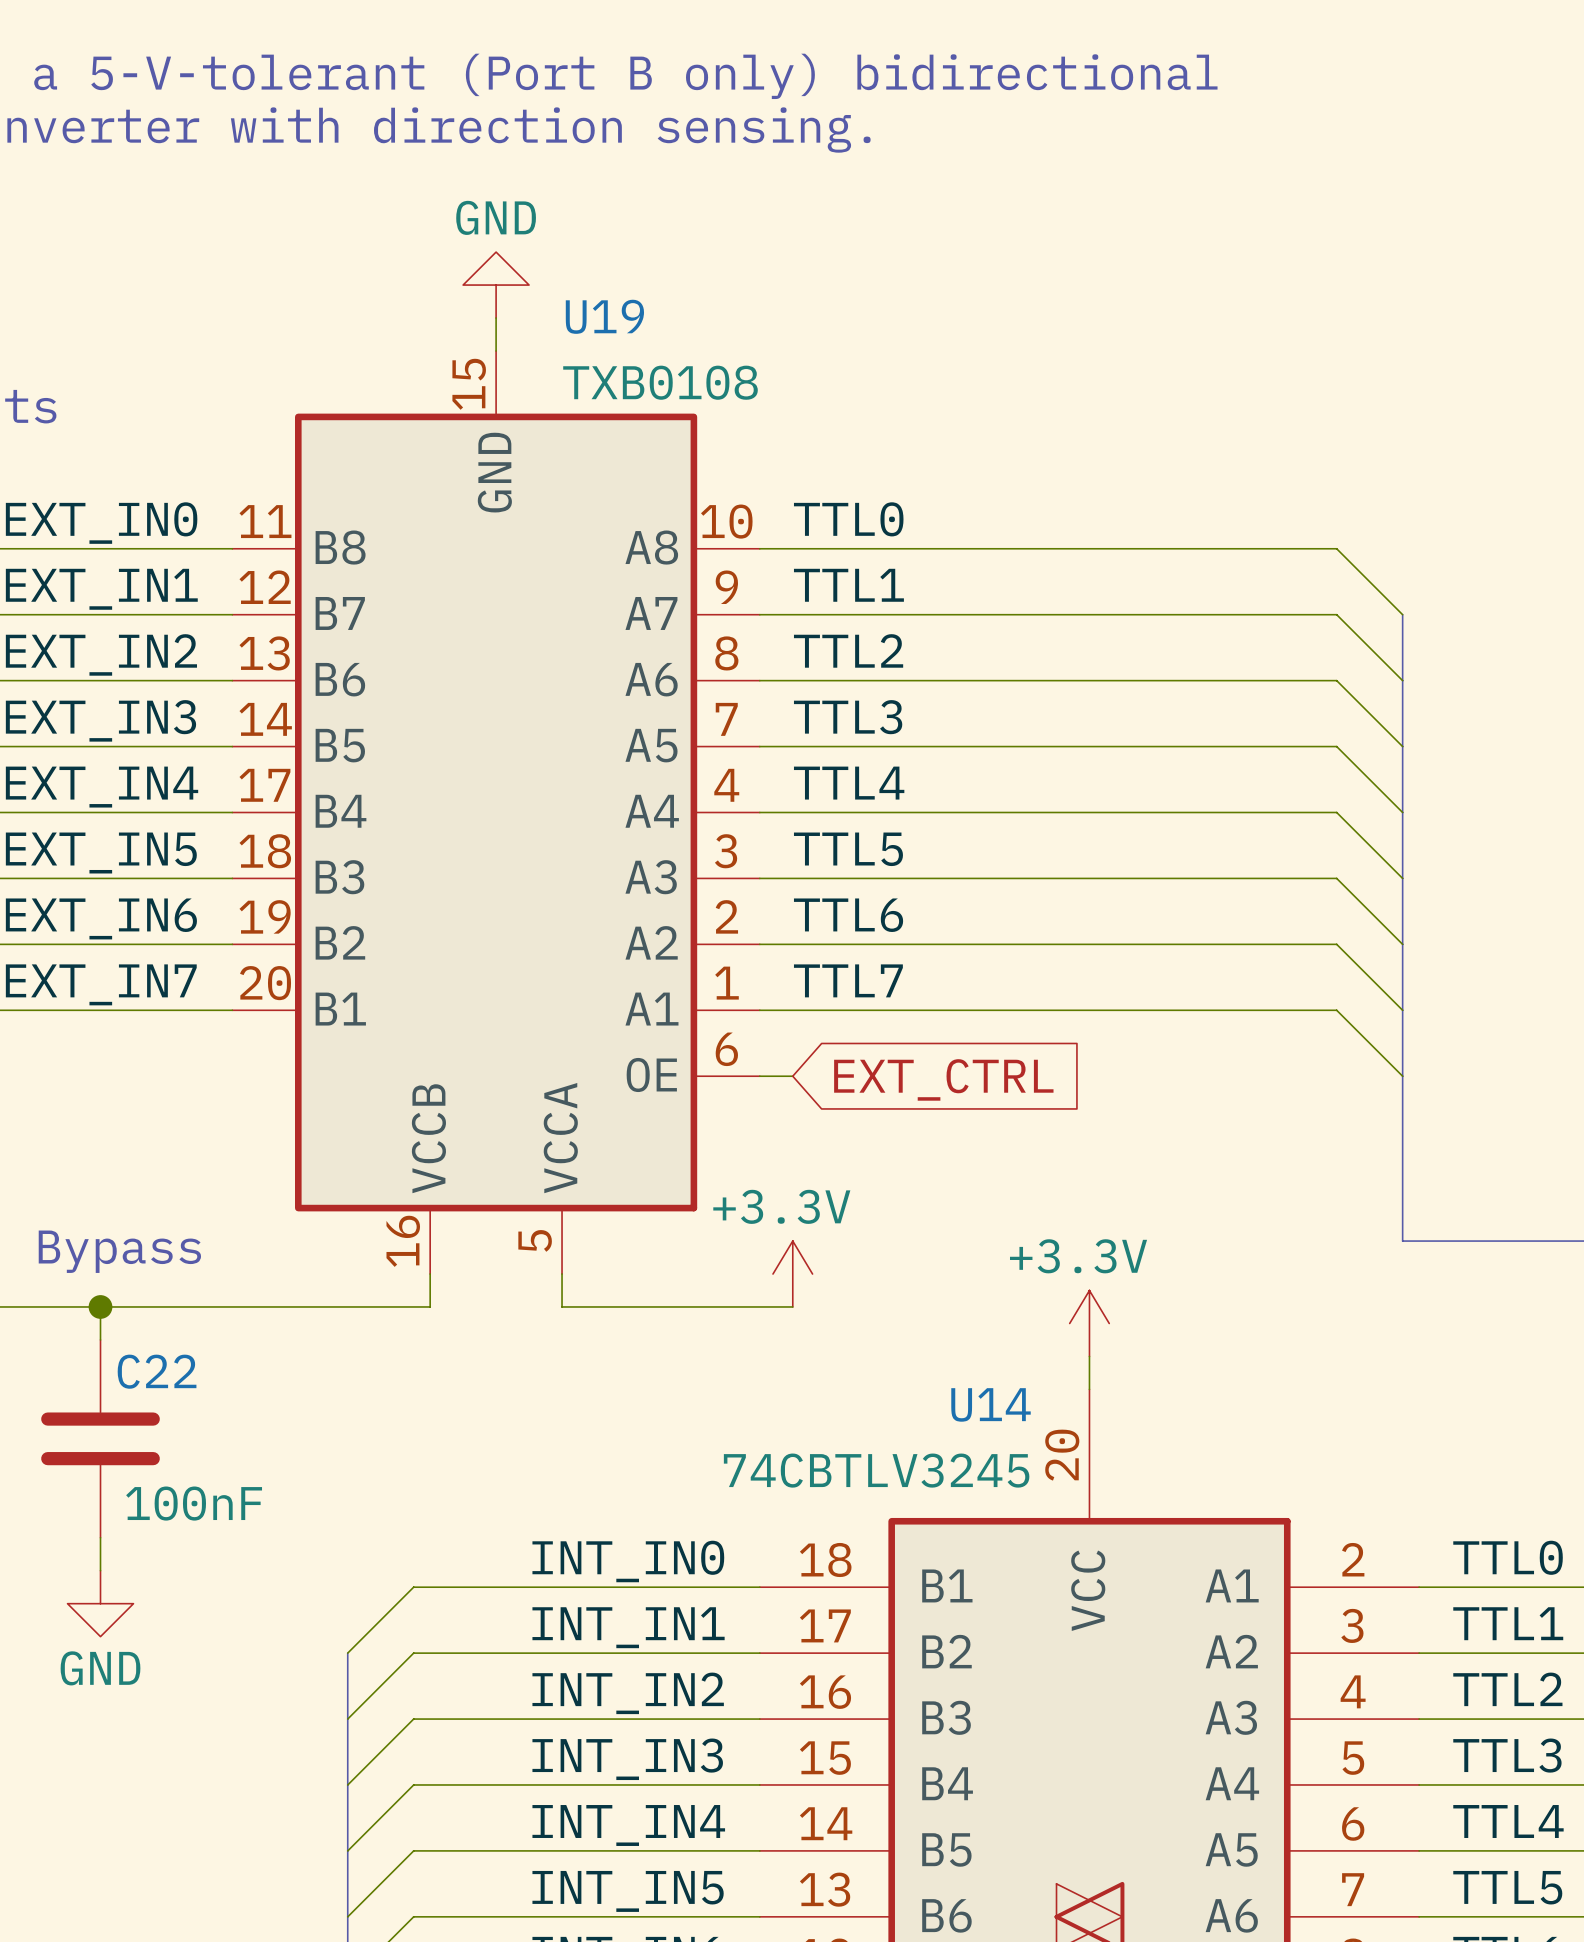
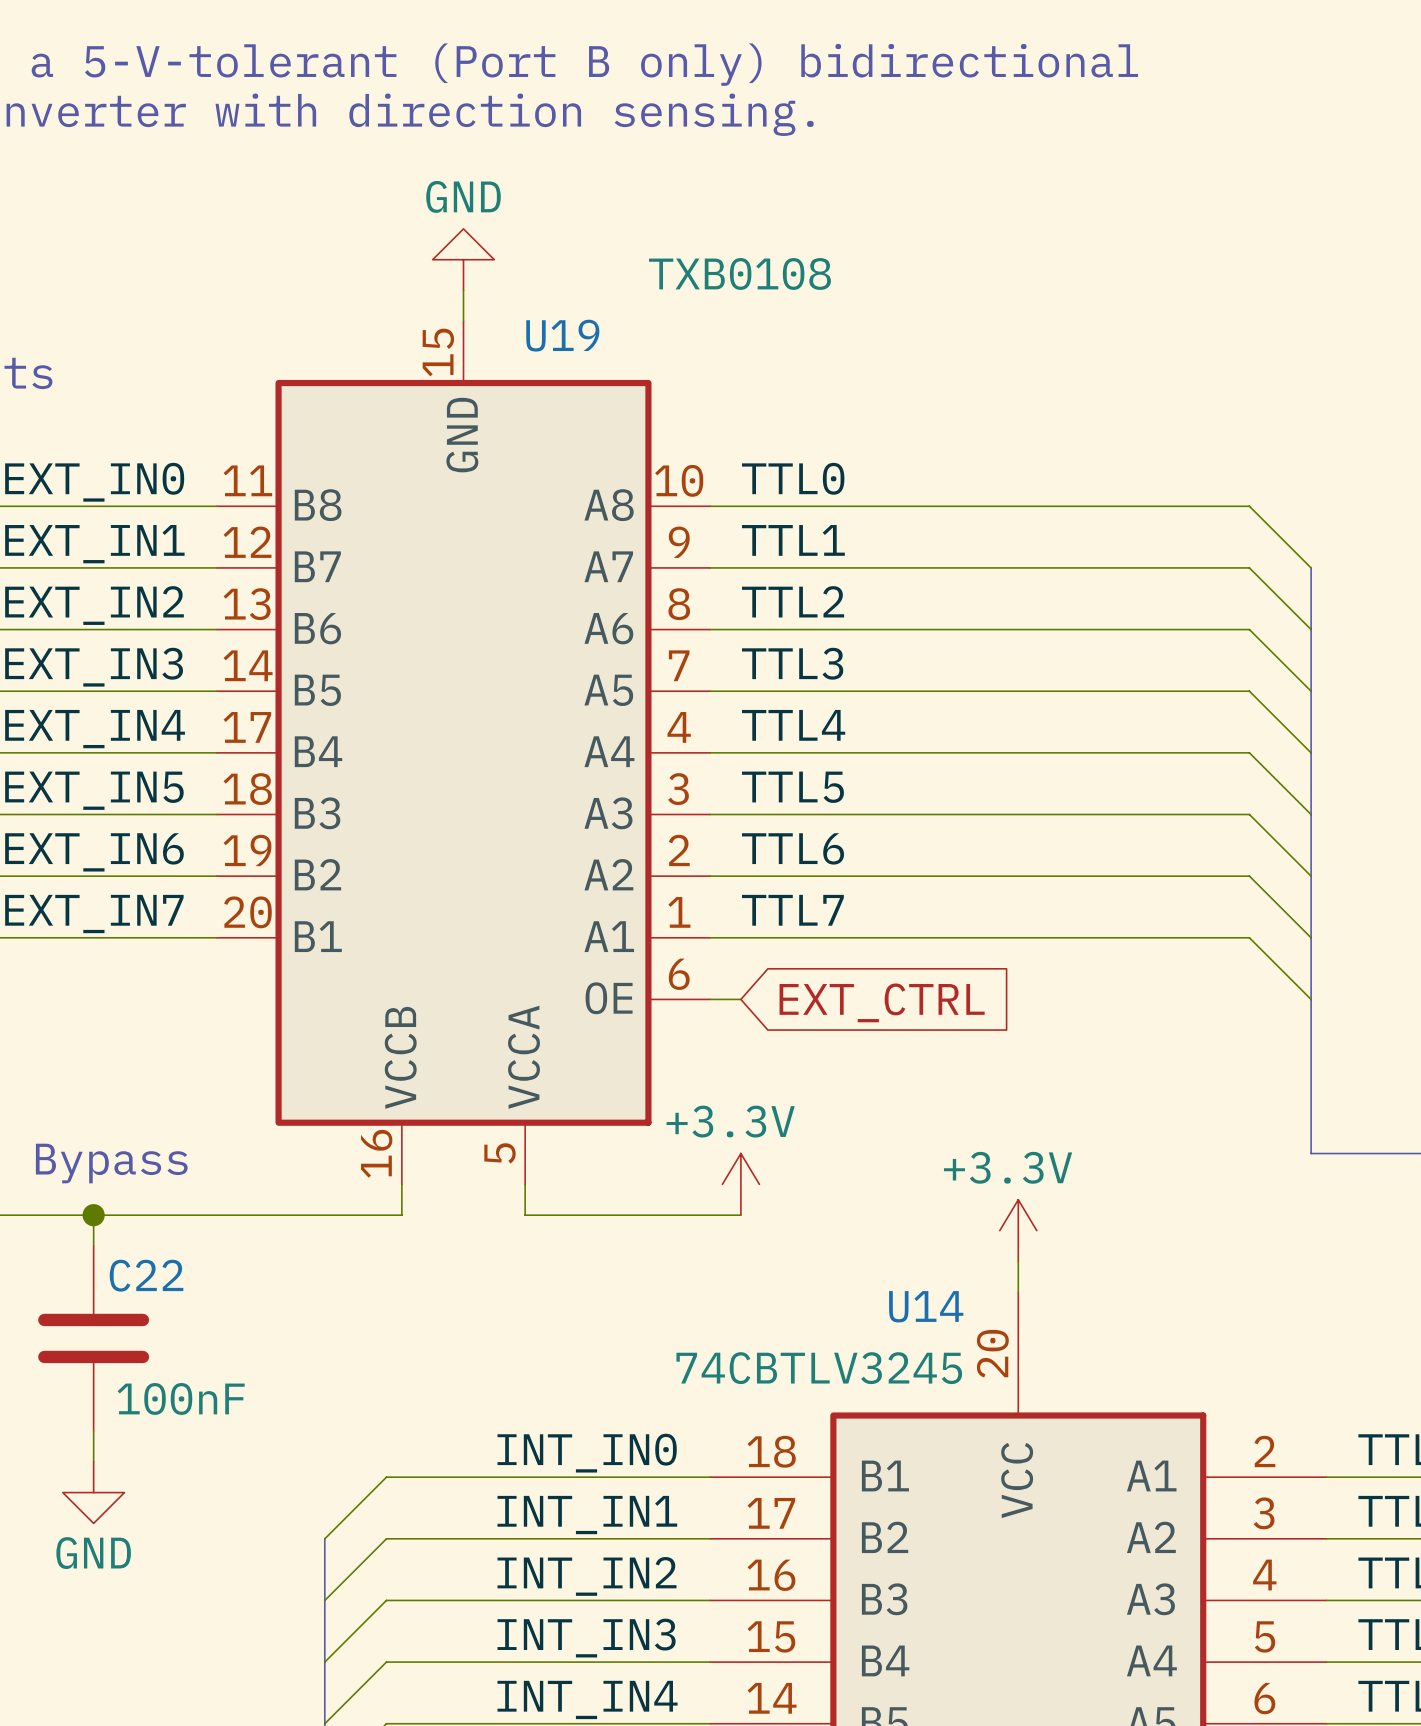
U19 name position: U19 (604, 316) -> U19 (562, 335)
U19 value position: TXB0108 (660, 382) -> TXB0108 (739, 273)

